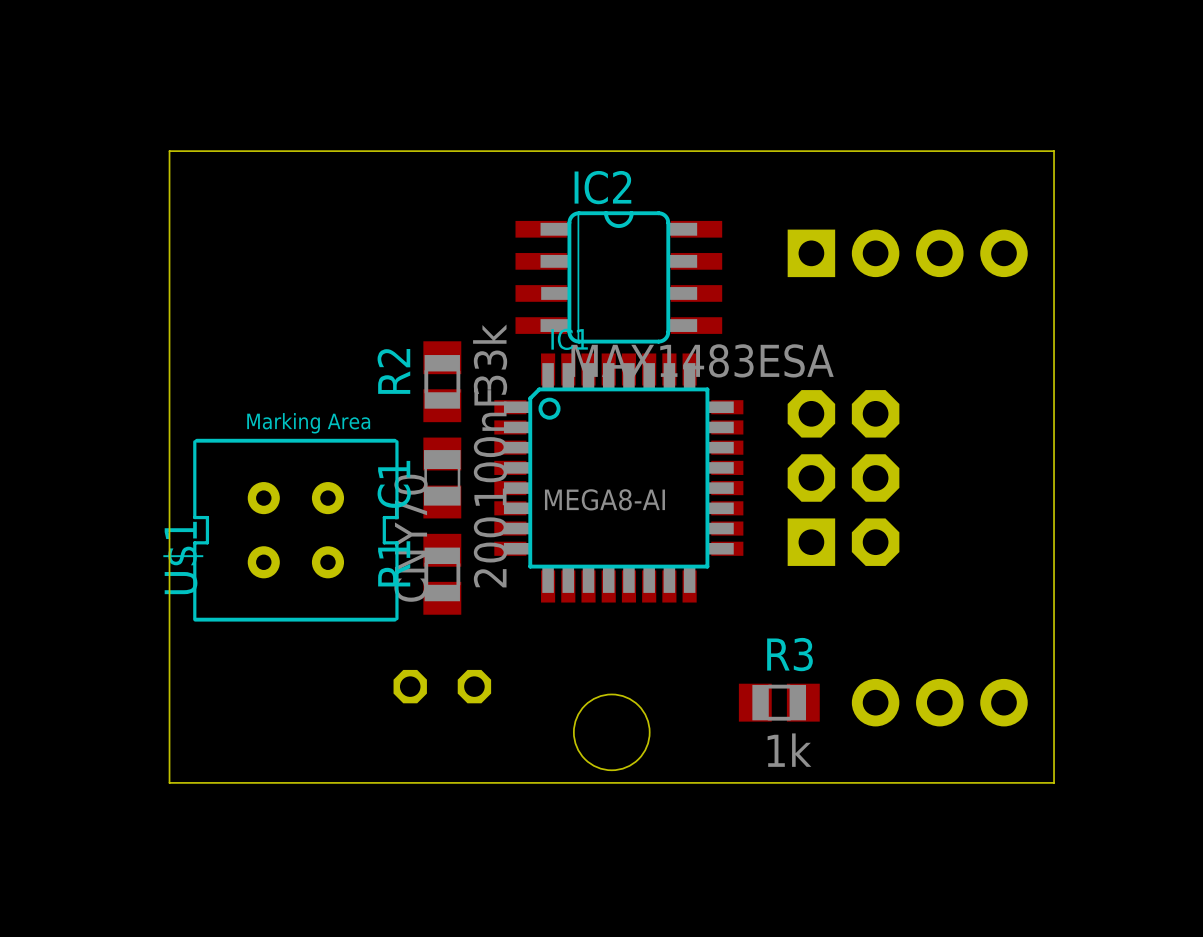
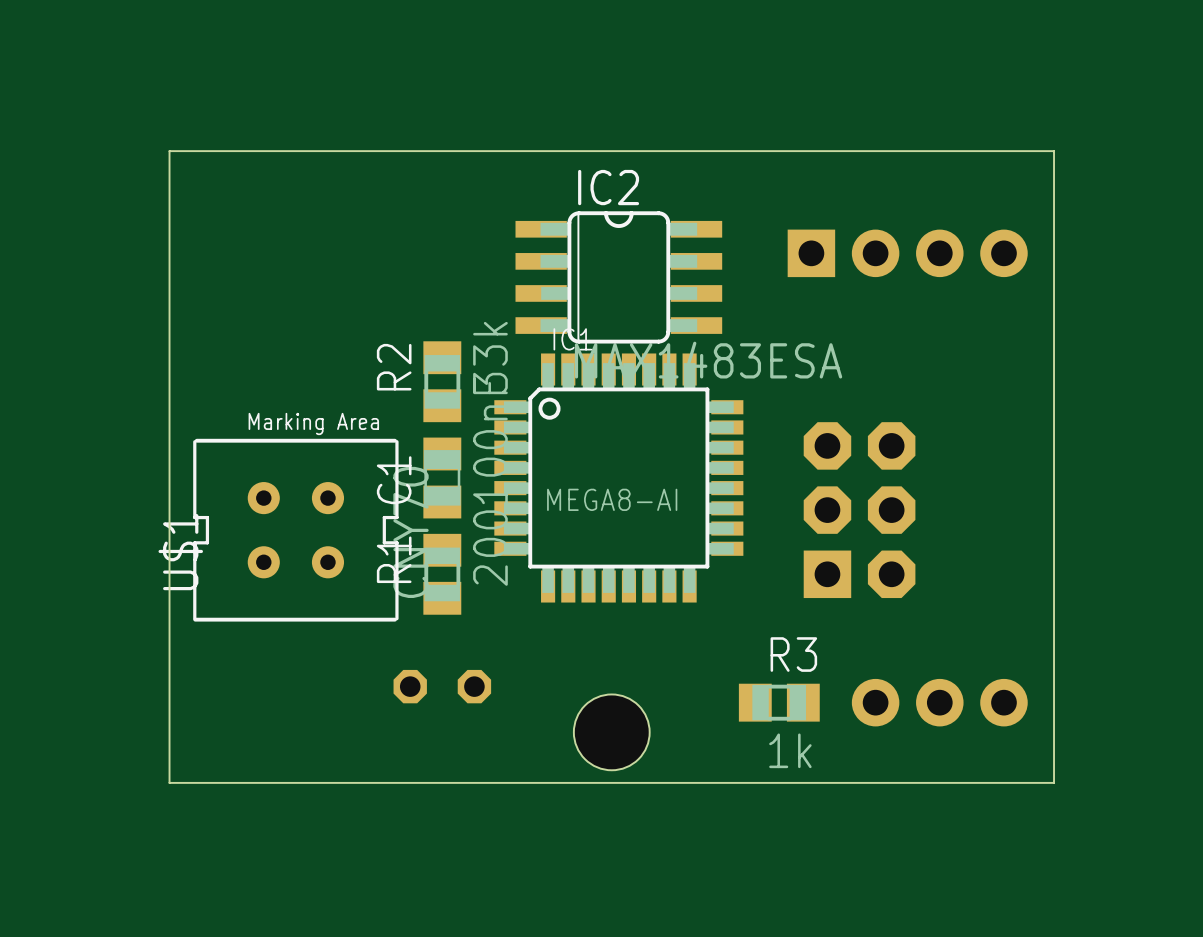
part position: (843, 478) -> (859, 510)

